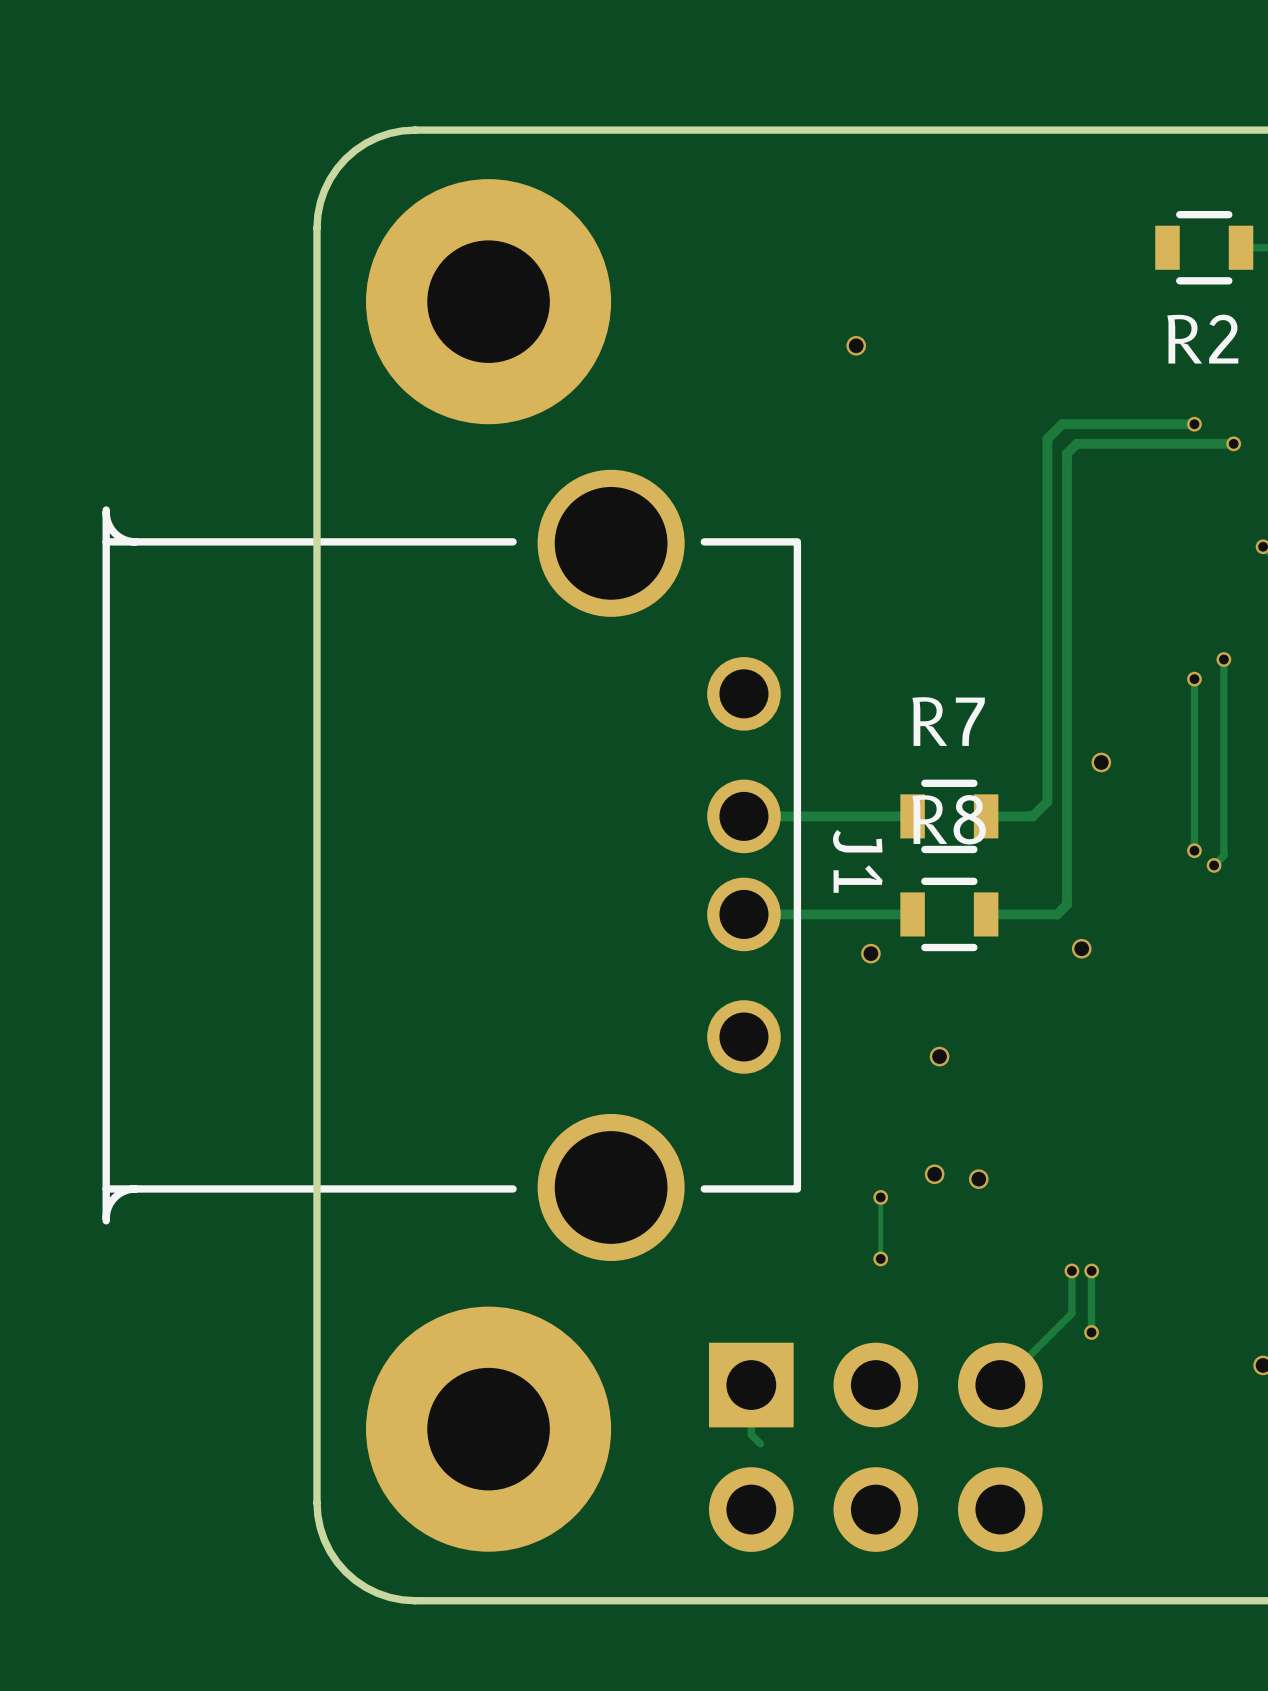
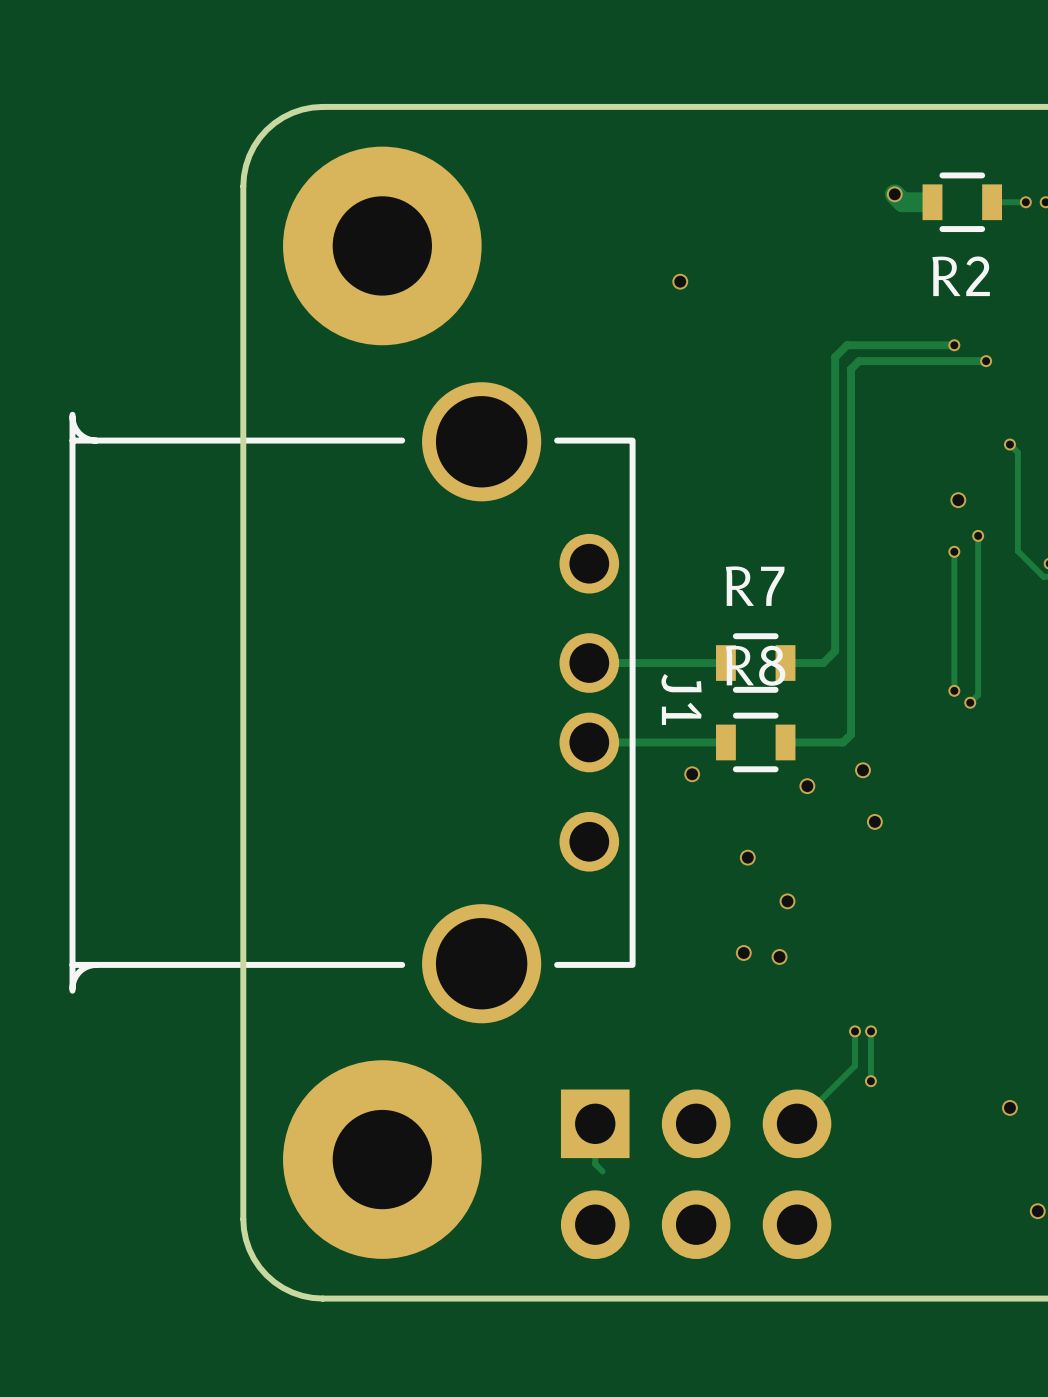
track: none -> (894, 194) (902, 202) (932, 202)
via: none -> (894, 194)
via: none -> (958, 500)
via: (1101, 762) -> none
via: none -> (807, 786)
via: none -> (874, 821)
via: none -> (787, 901)
track: (880, 1197) (880, 1258) -> none
via: (880, 1197) -> none
via: (880, 1258) -> none

